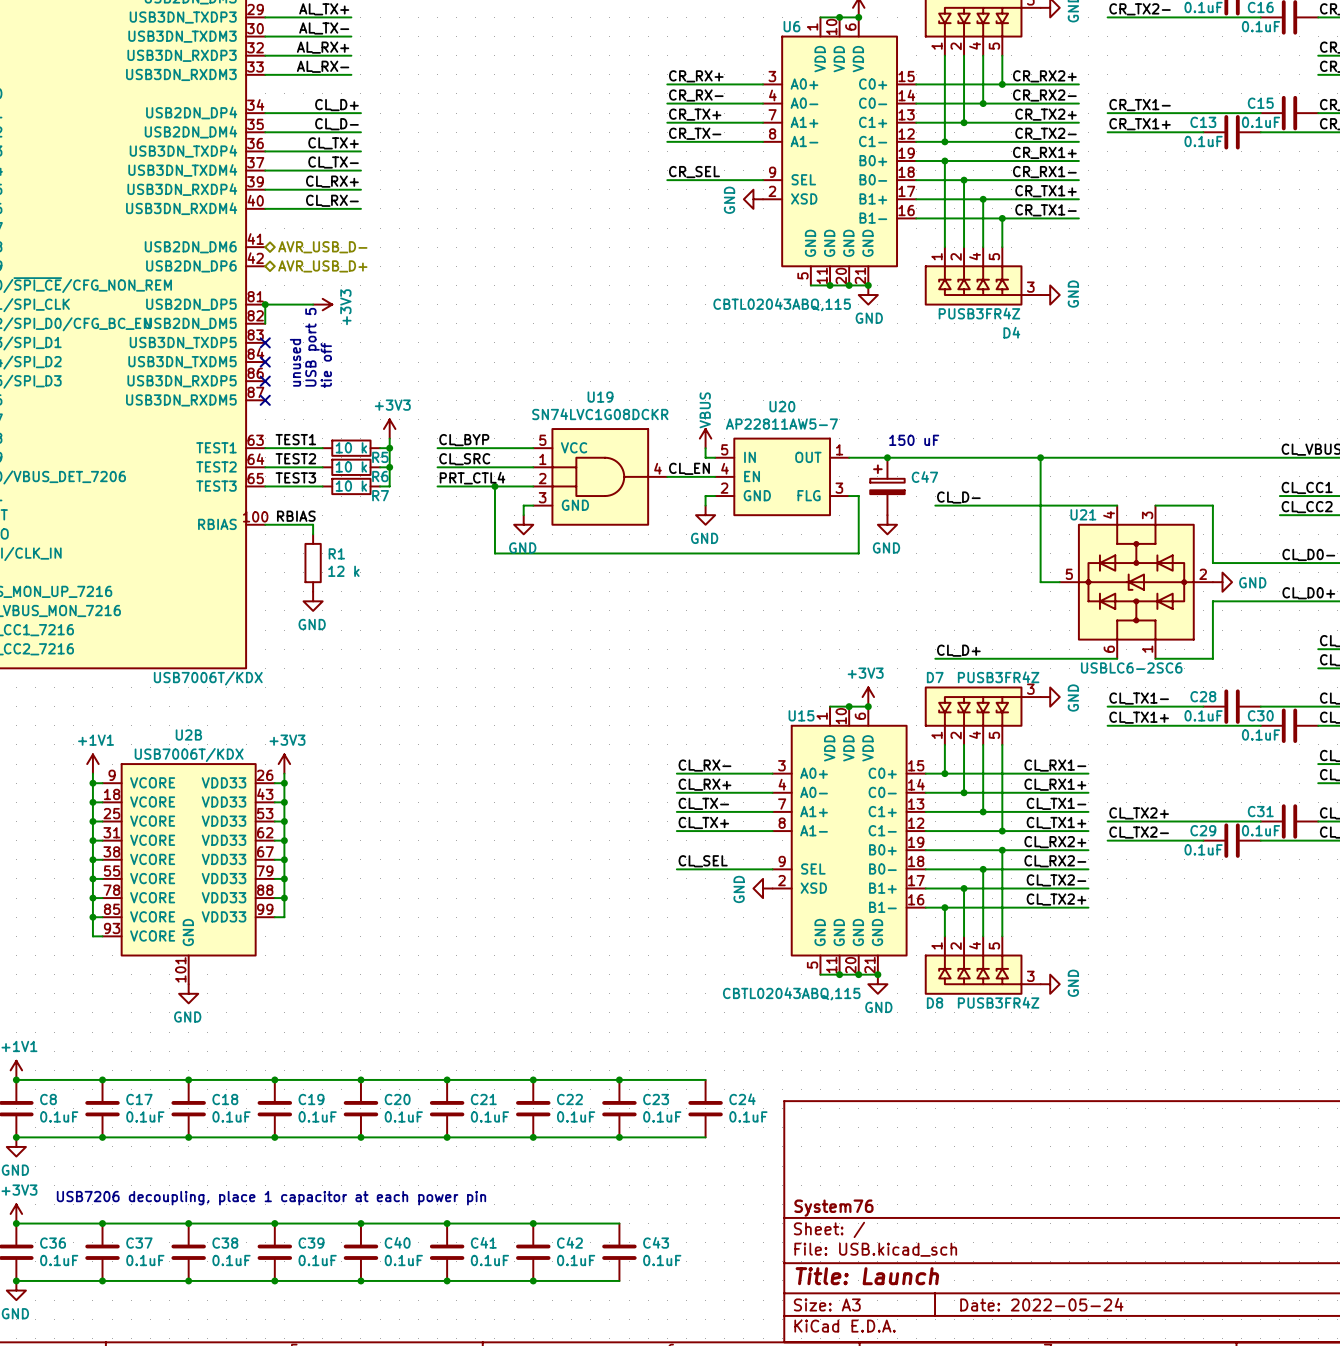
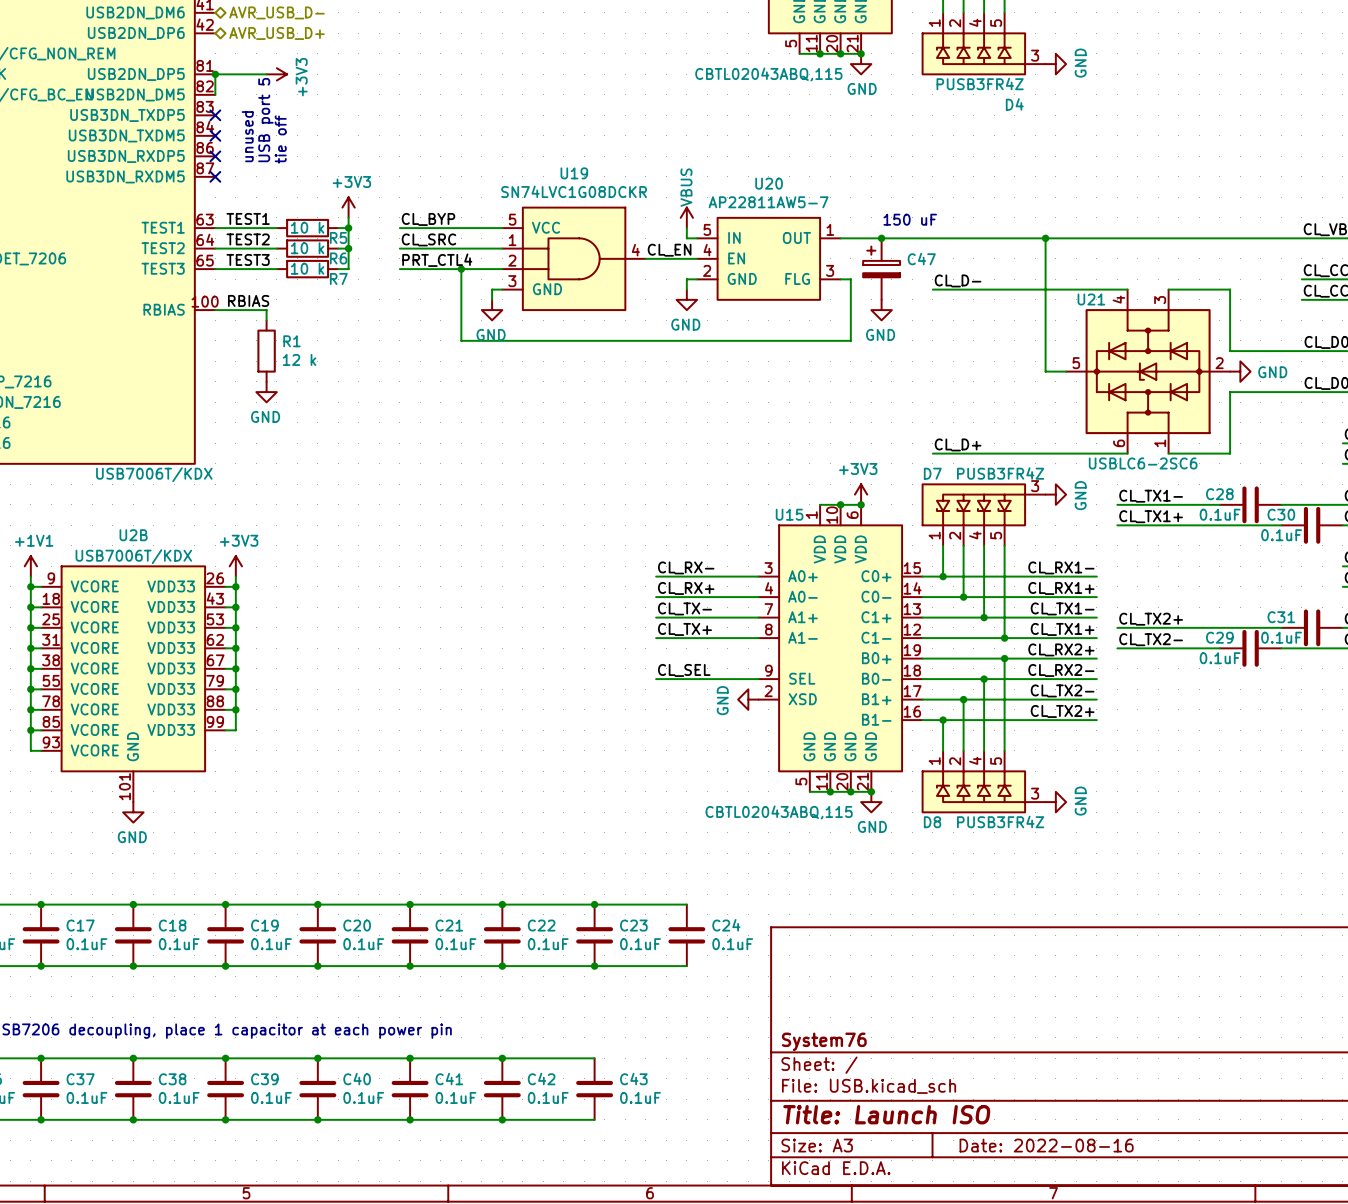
title block: Title: Launch (867, 1276) -> Title: Launch ISO (886, 1114)
title block: Date: 2022-05-24 (1041, 1304) -> Date: 2022-08-16 (1046, 1145)

